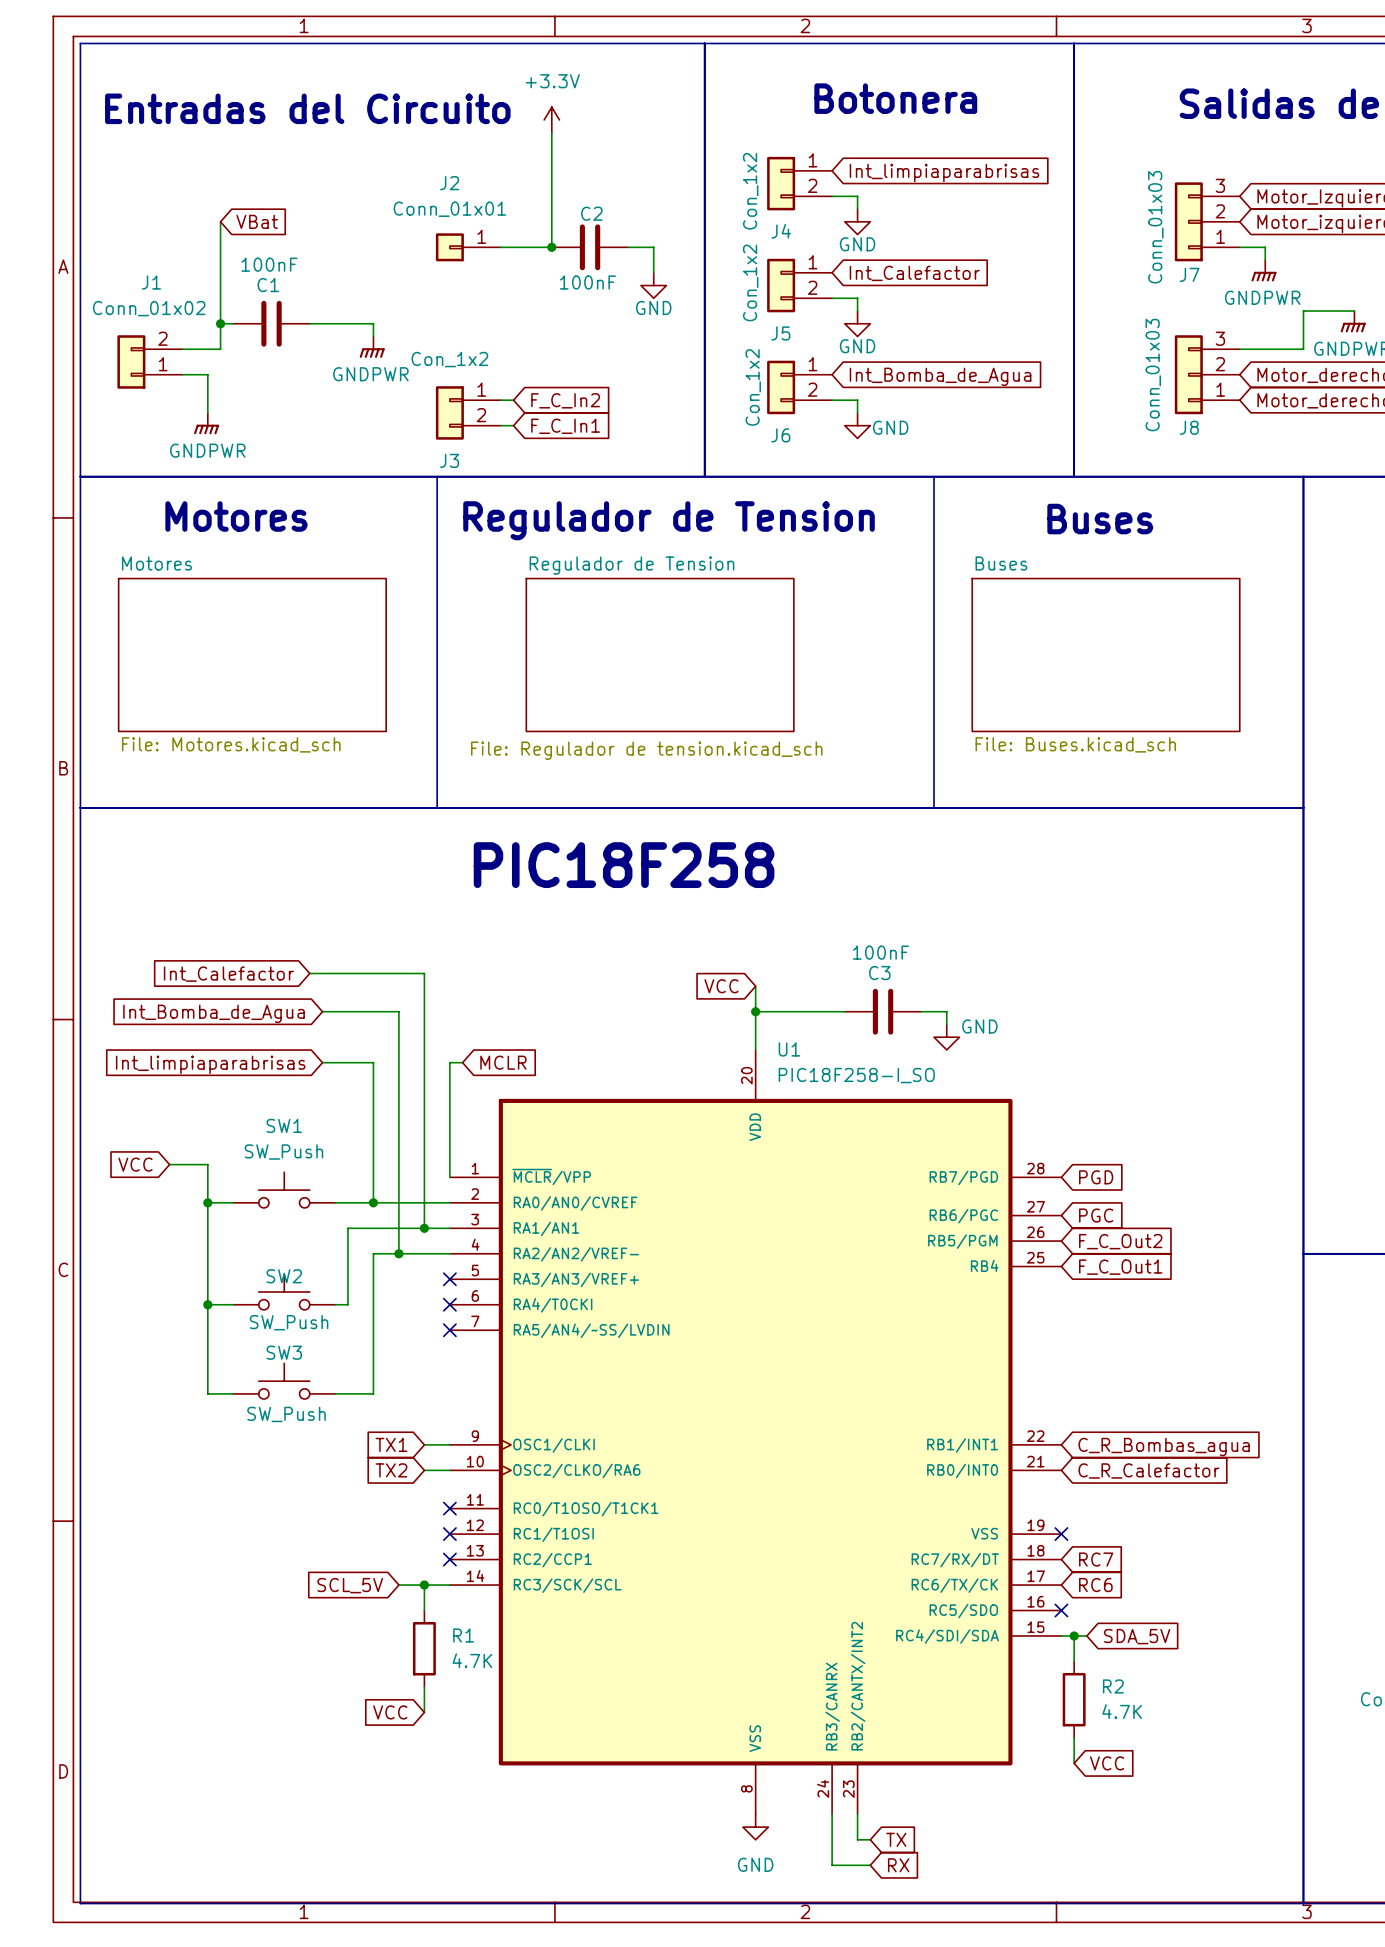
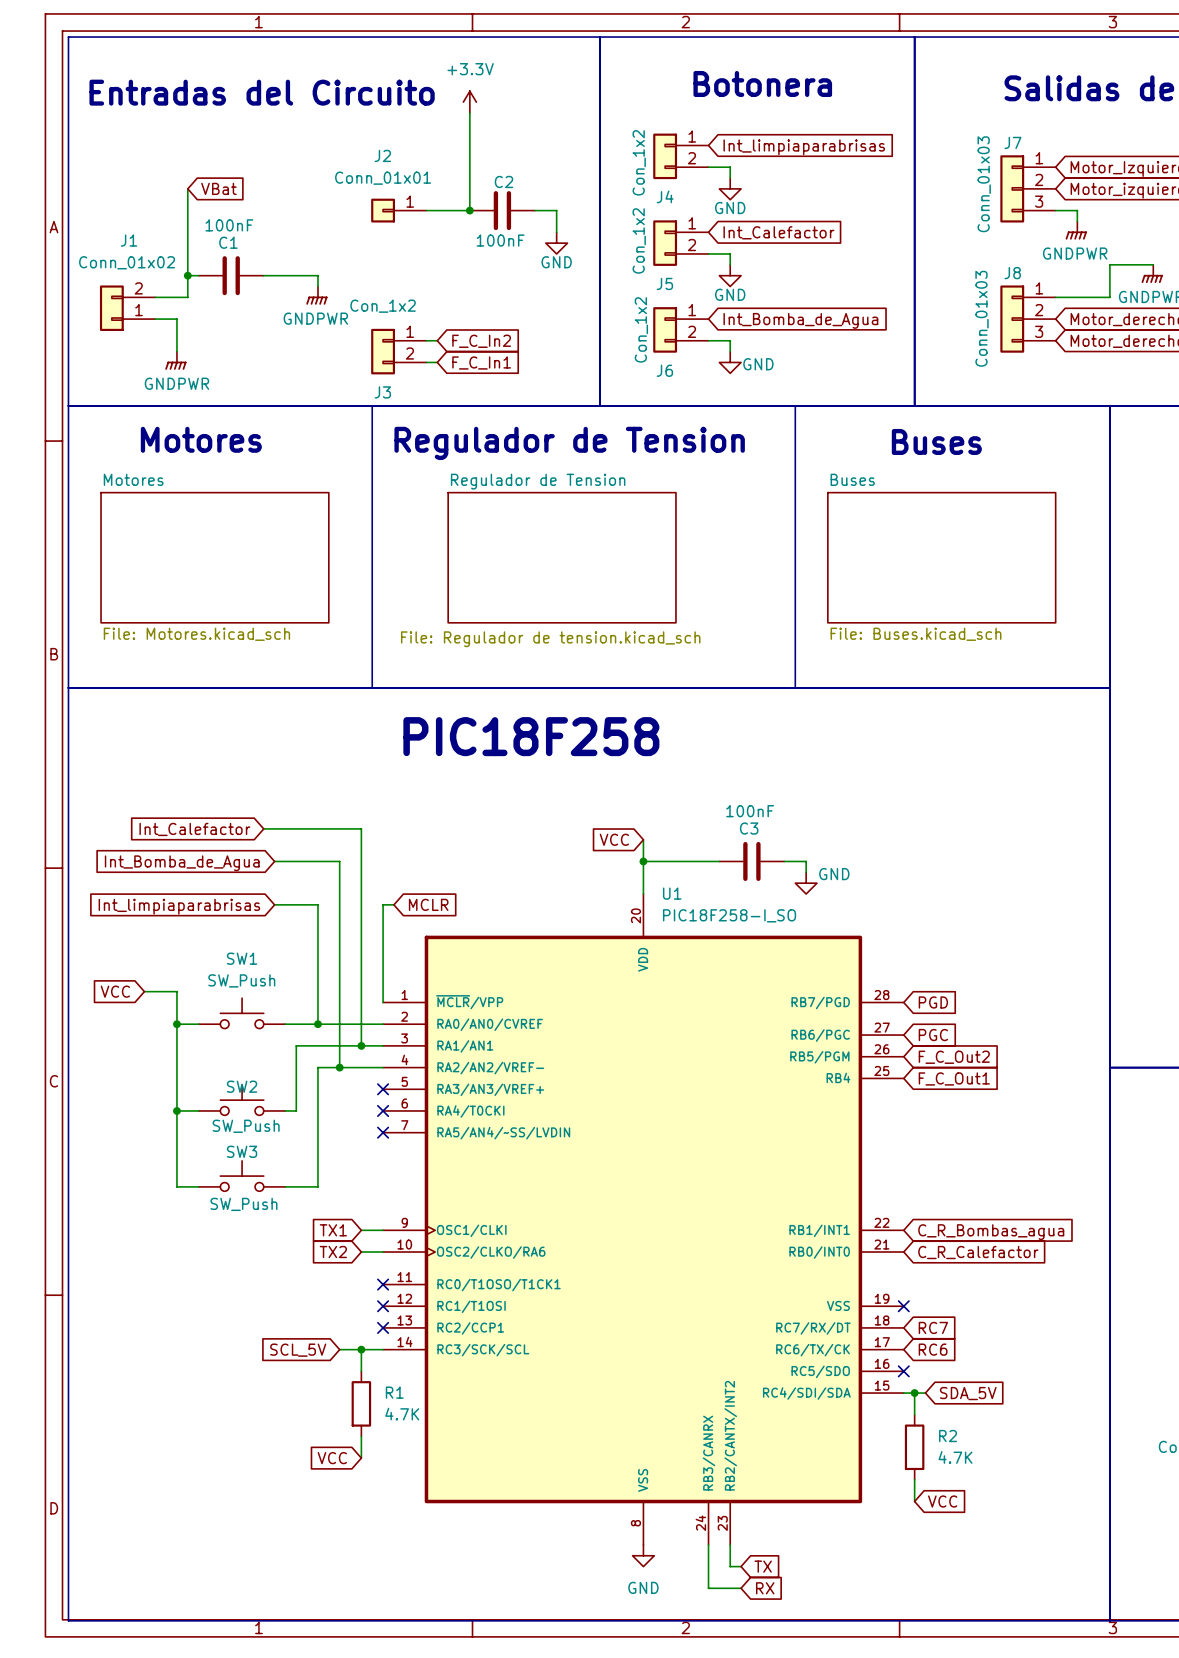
J7 flip: as is (1188, 221) -> up-down (1012, 188)
J8 flip: as is (1188, 374) -> up-down (1012, 319)

